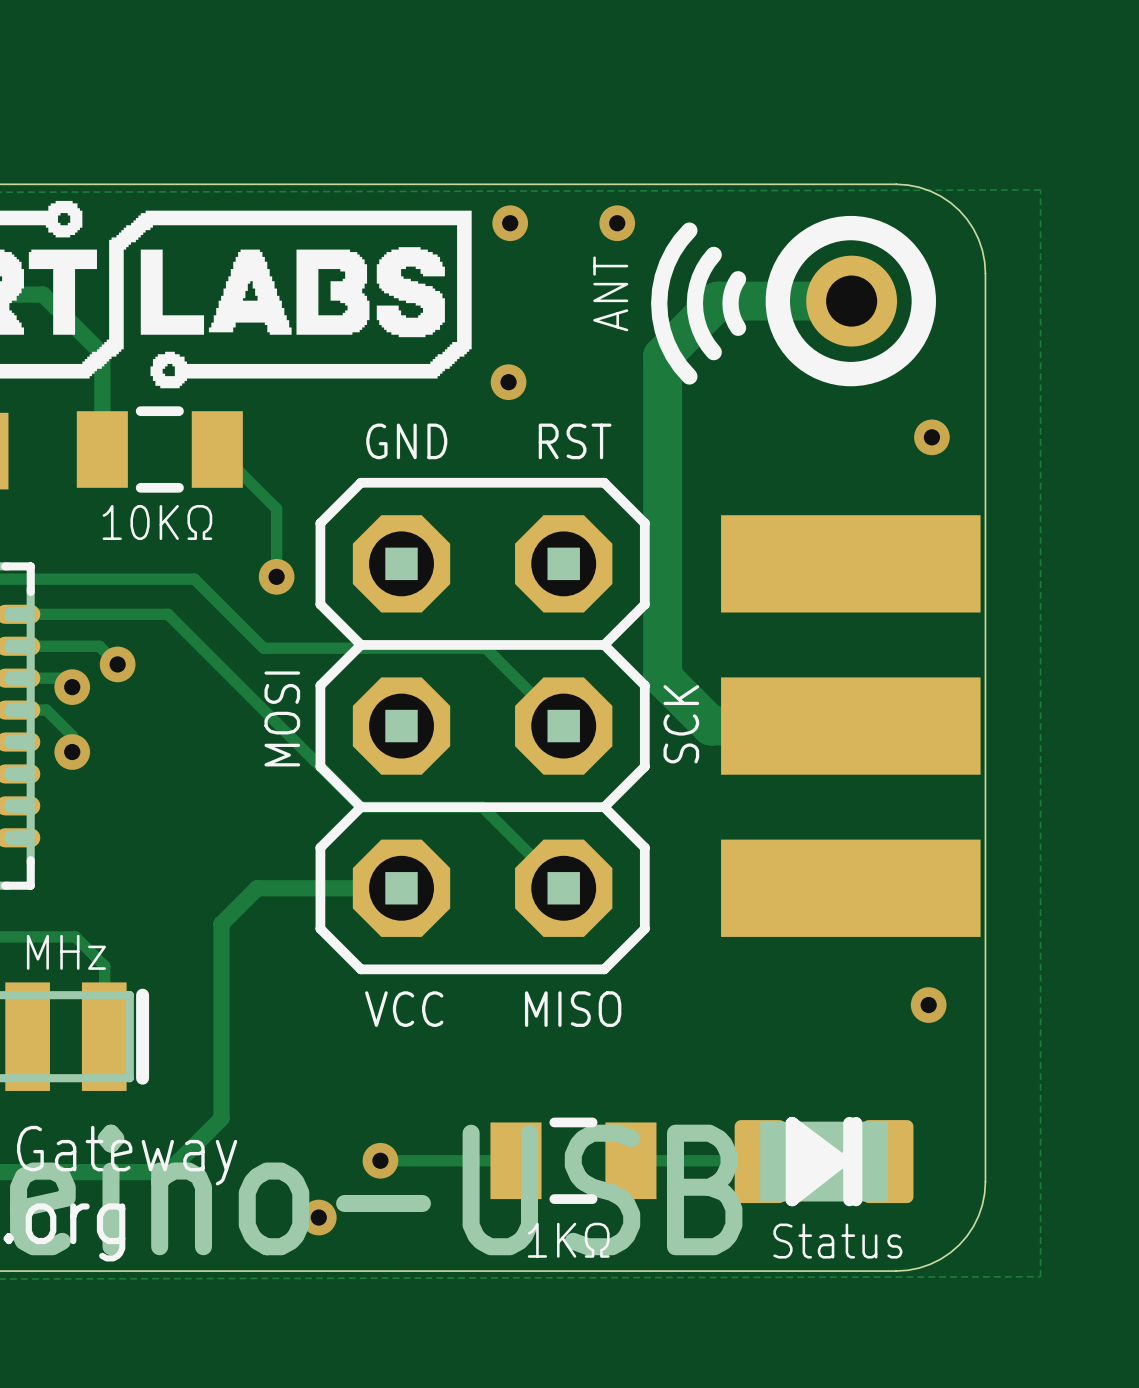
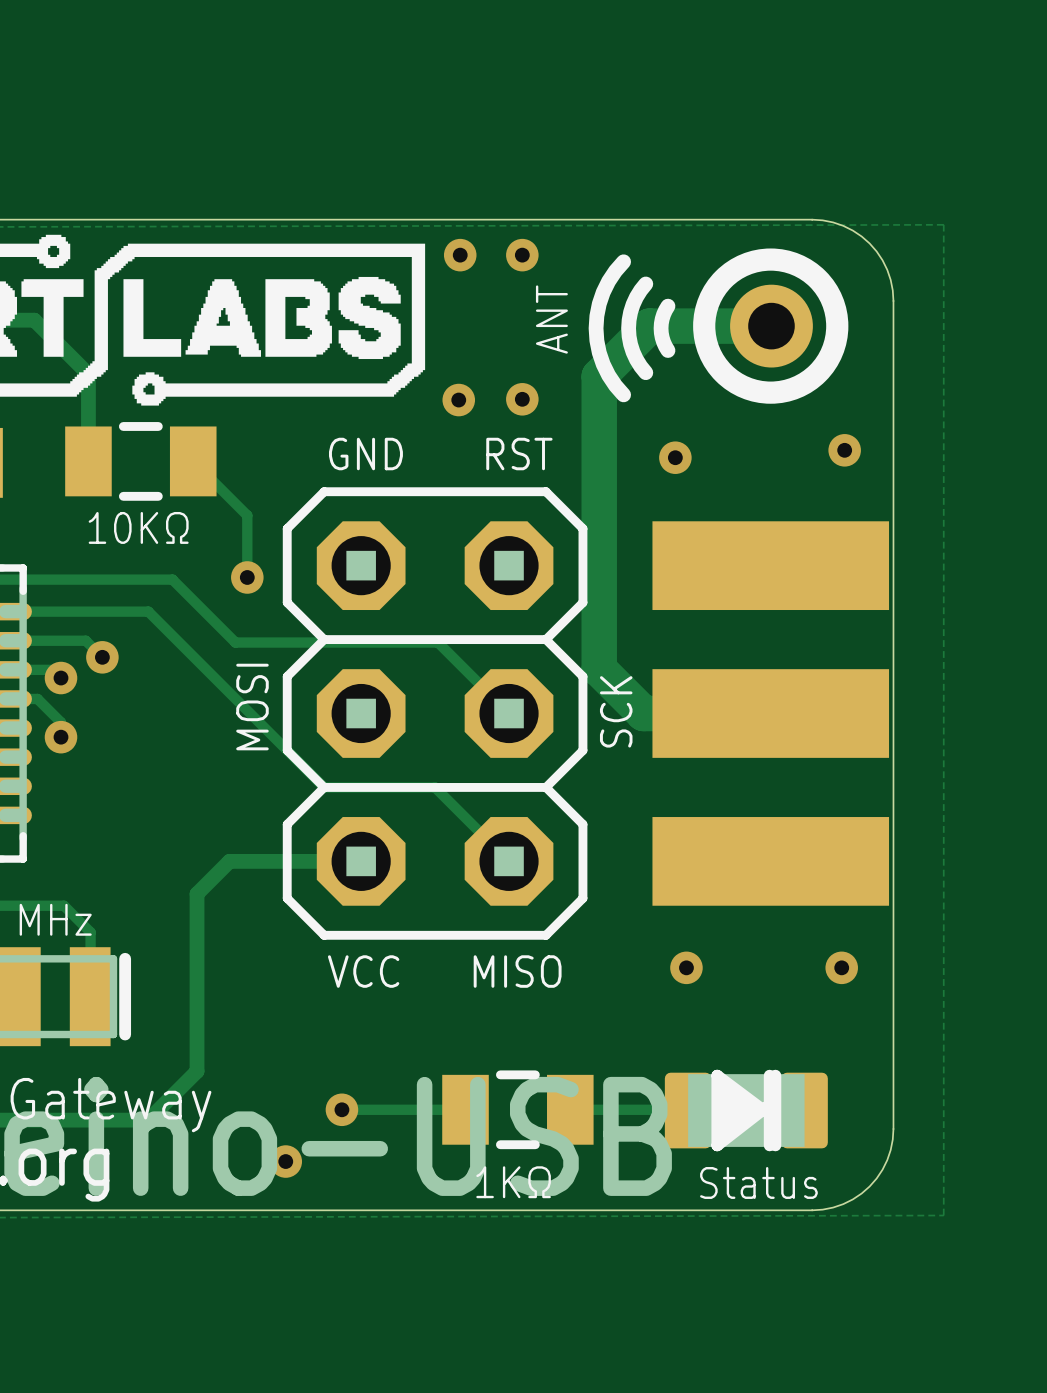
via position: (617, 223) -> (522, 255)
via: none -> (522, 399)
via: none -> (675, 457)
via: none -> (686, 967)

